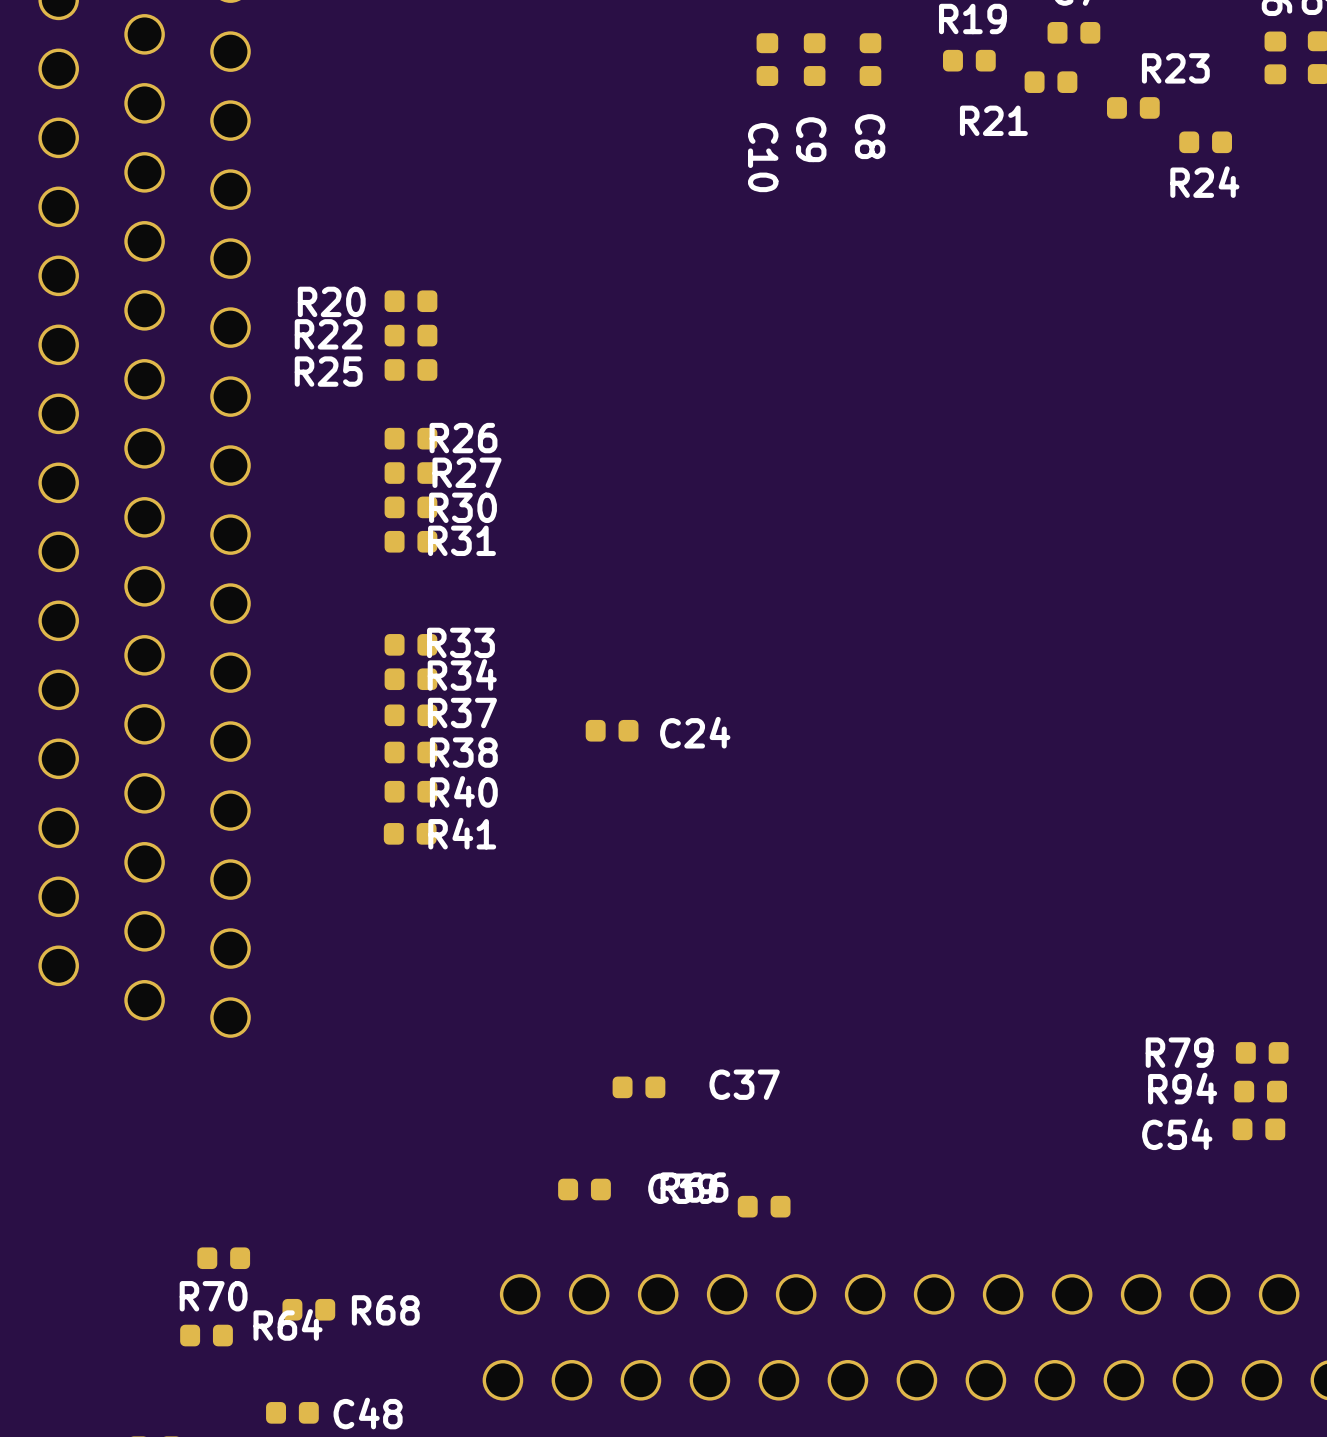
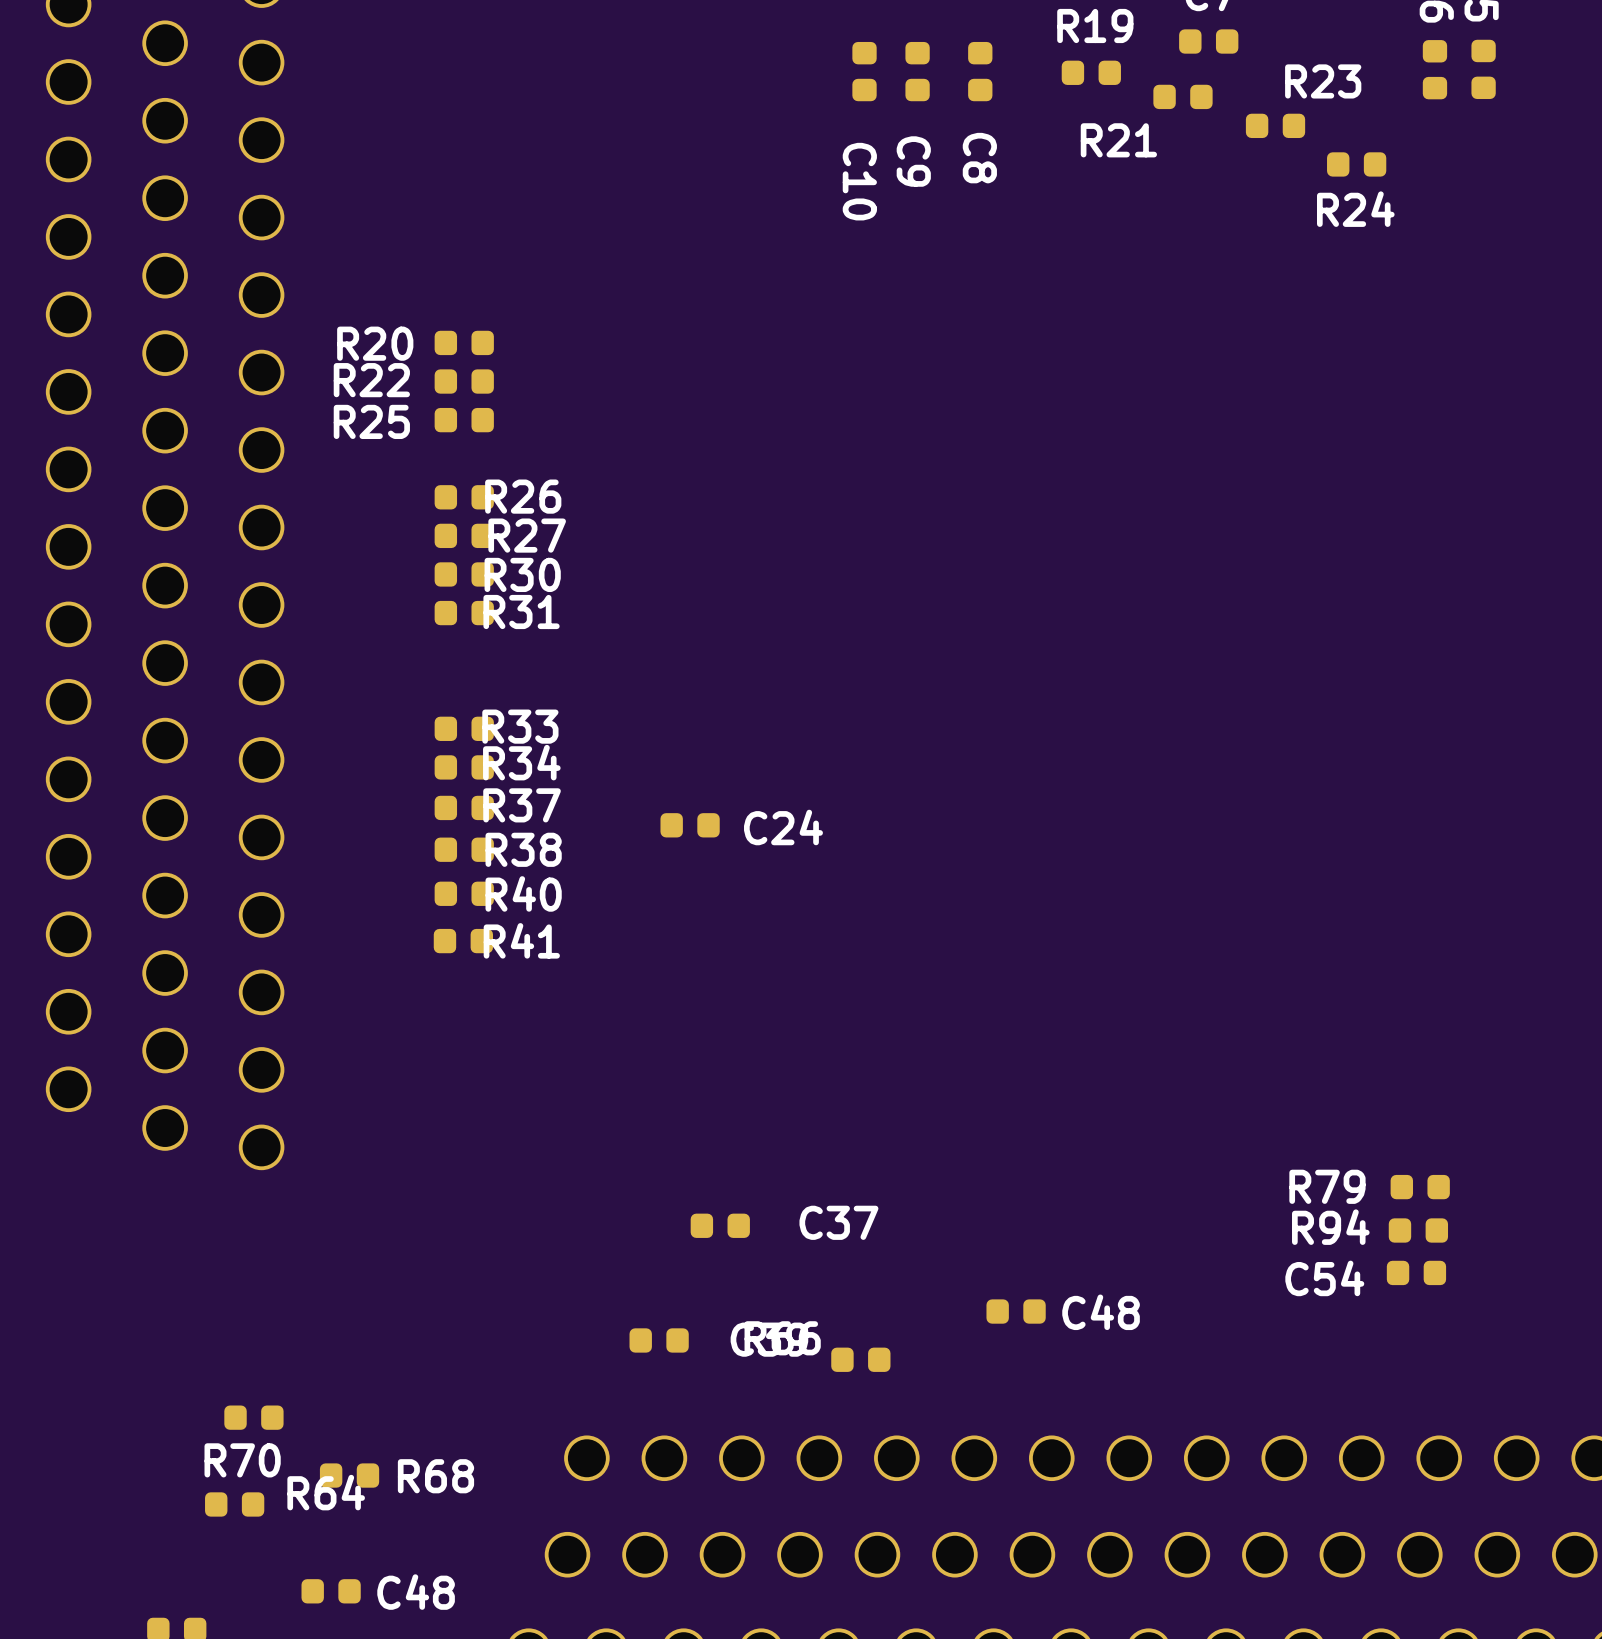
C48: none -> (1016, 1311)

